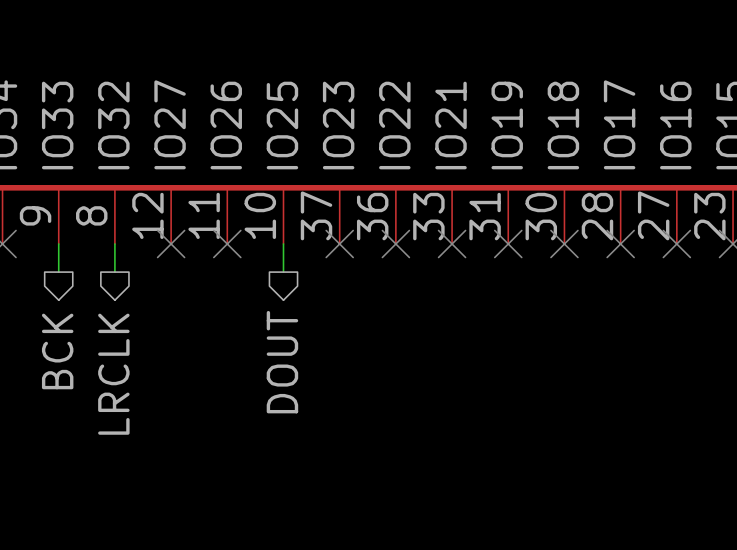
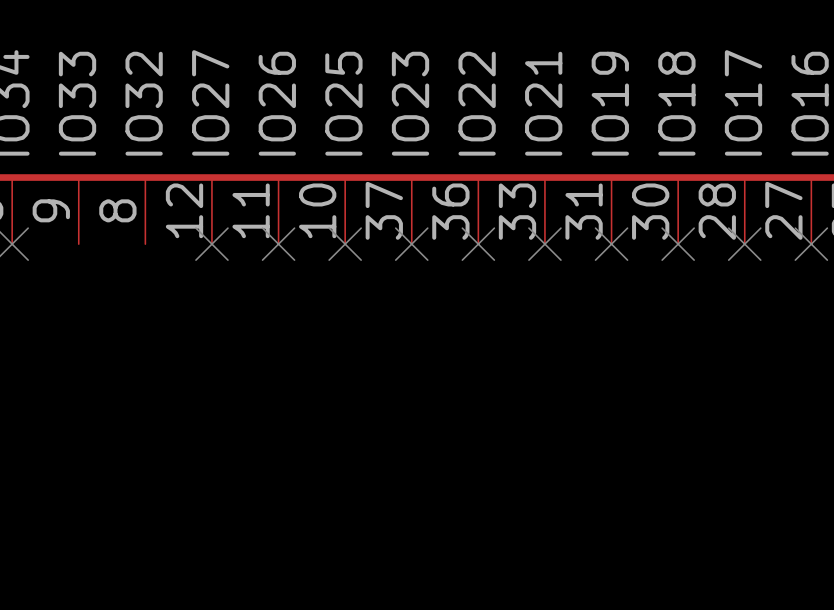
wire: (58, 243) (58, 272) -> none
wire: (114, 243) (114, 272) -> none
wire: (283, 243) (283, 272) -> none
no-connect mark: none -> (345, 244)
hierarchical label: BCK (57, 351) -> none
hierarchical label: DOUT (282, 362) -> none
hierarchical label: LRCLK (113, 374) -> none

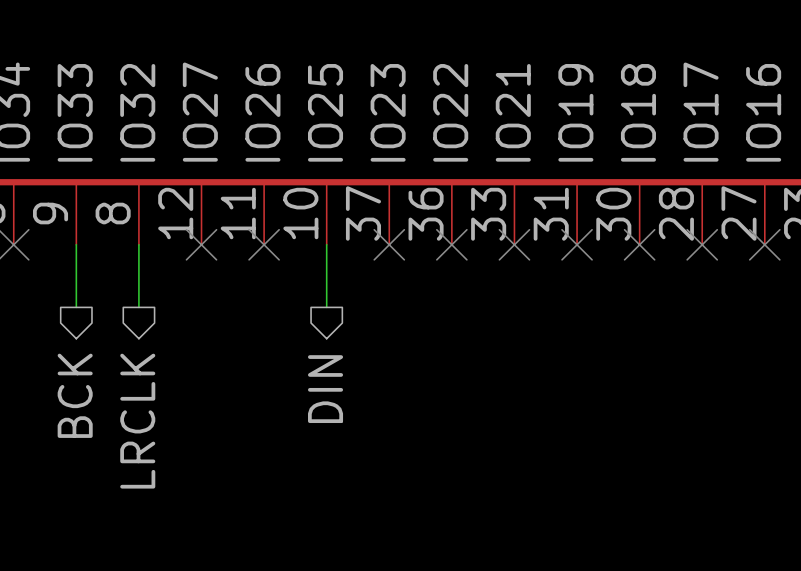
wire: none -> (76, 244) (76, 307)
wire: none -> (138, 244) (138, 307)
wire: none -> (326, 244) (326, 307)
no-connect mark: (345, 244) -> none
hierarchical label: none -> DIN (325, 389)
hierarchical label: none -> BCK (75, 395)
hierarchical label: none -> LRCLK (137, 421)

